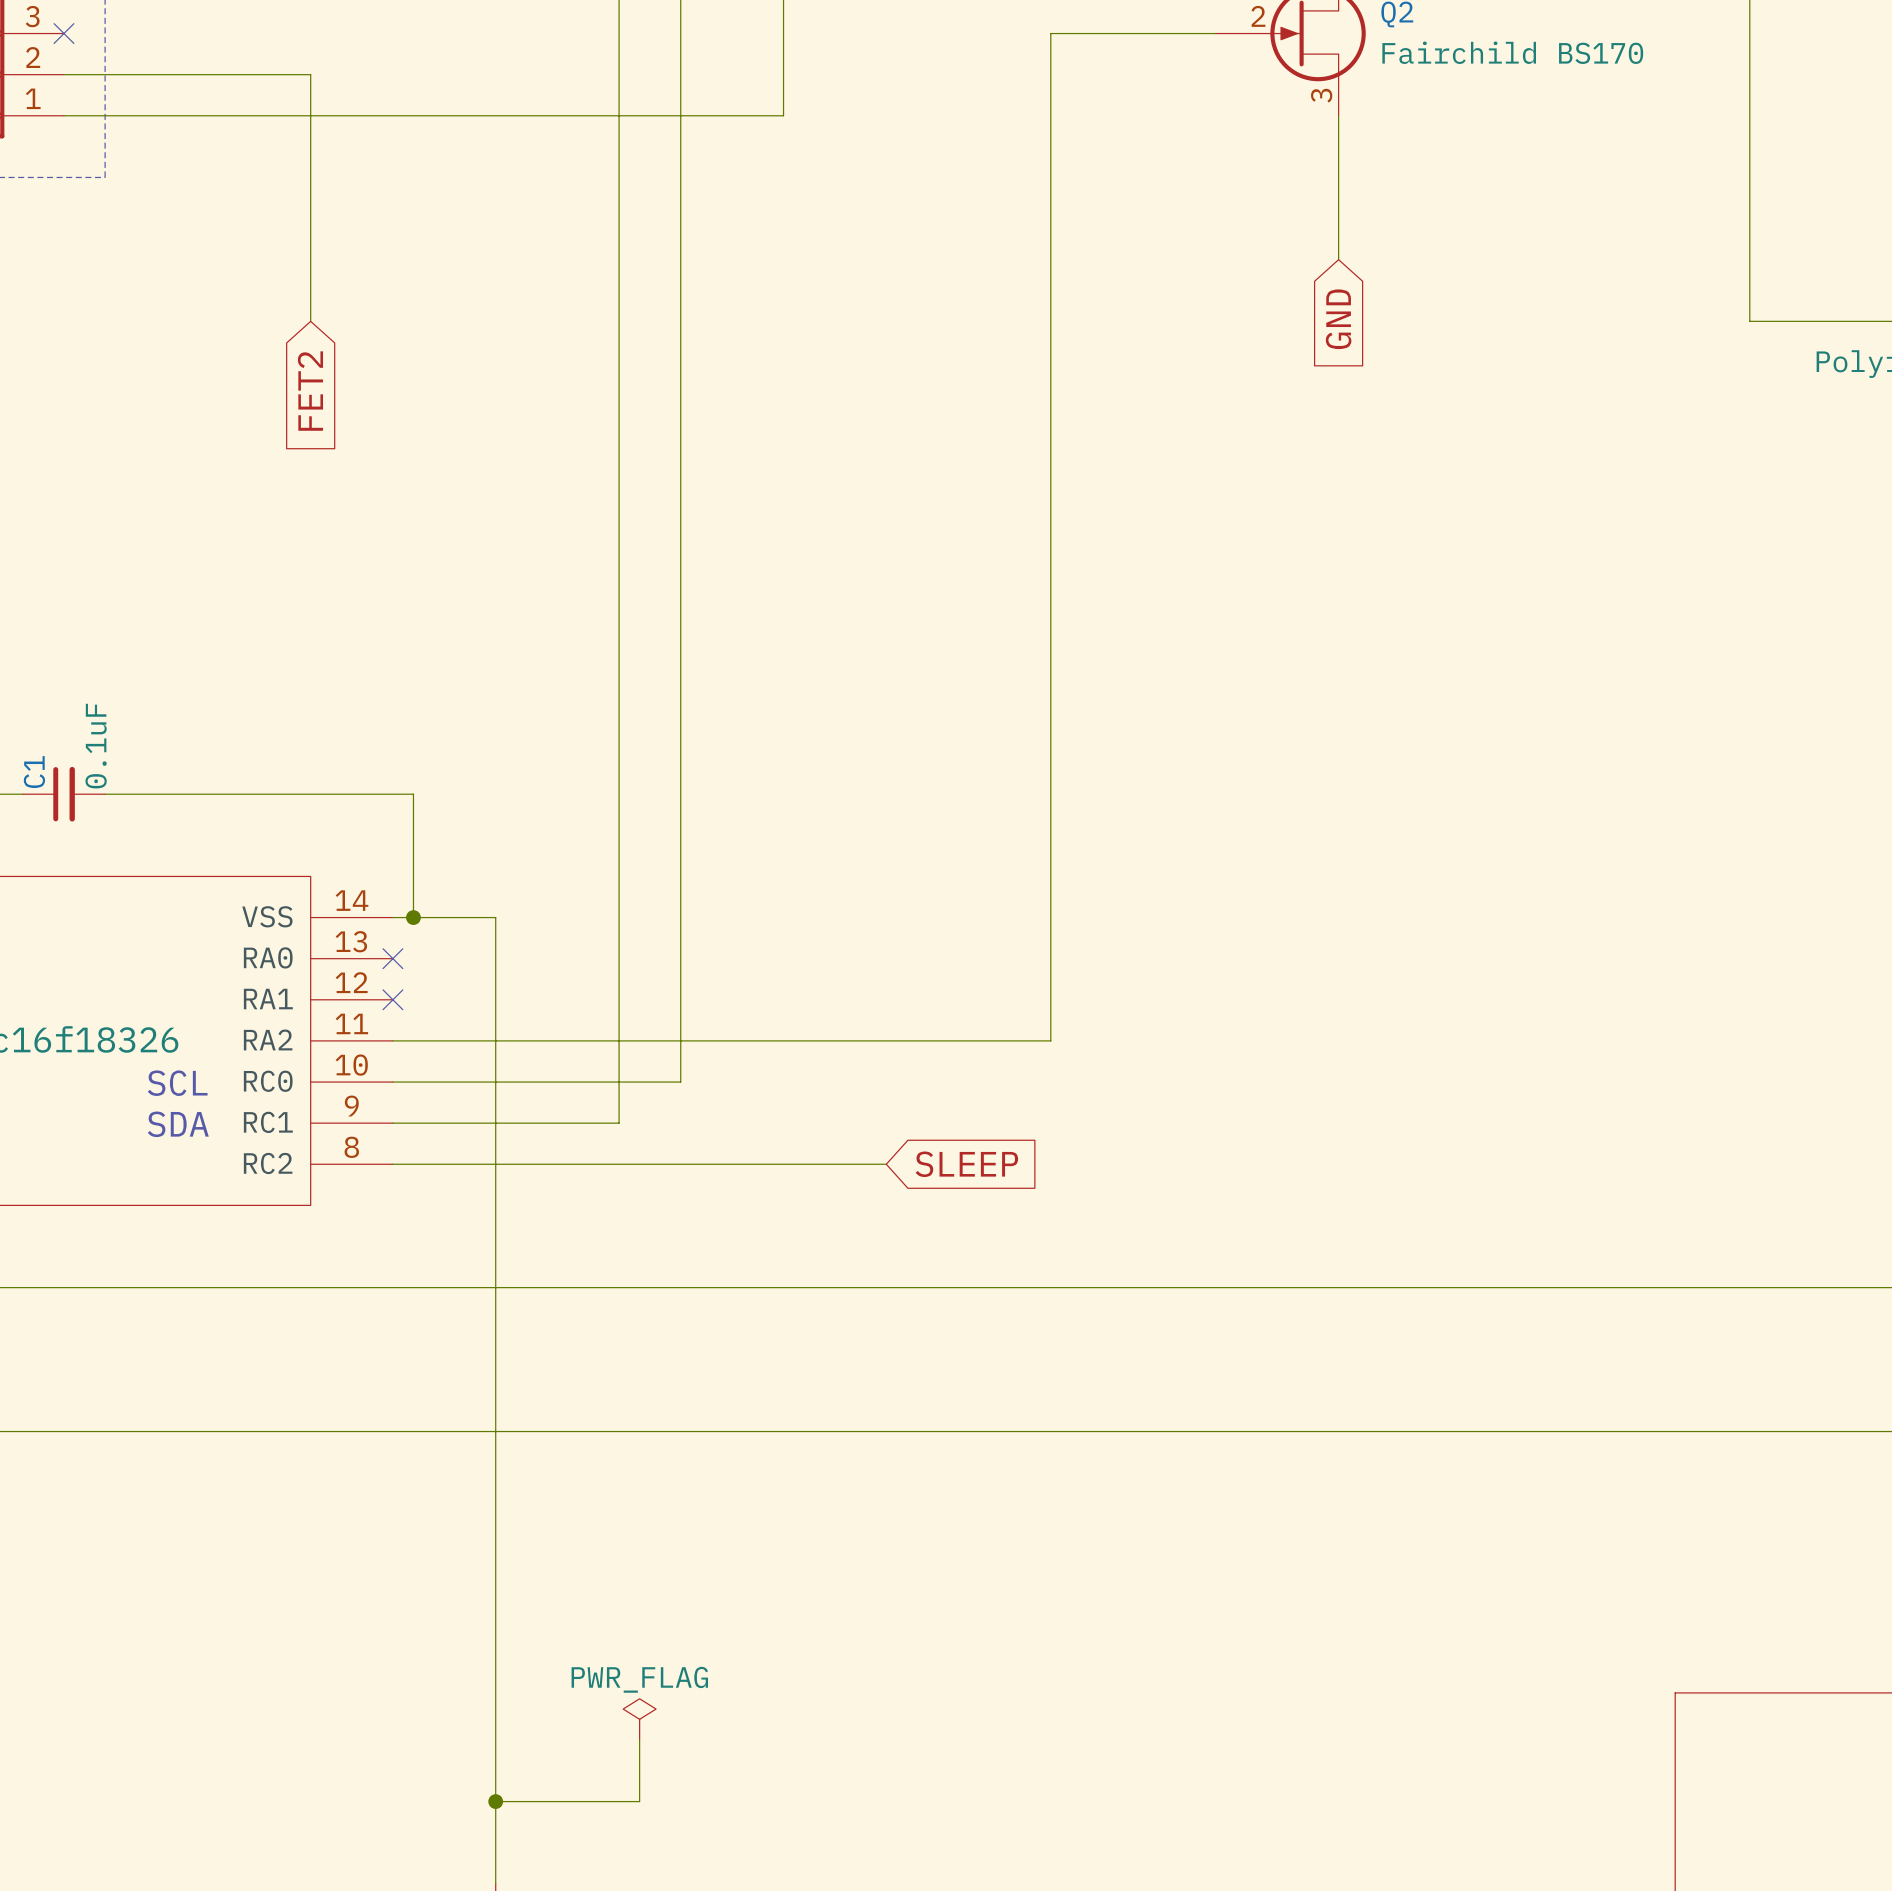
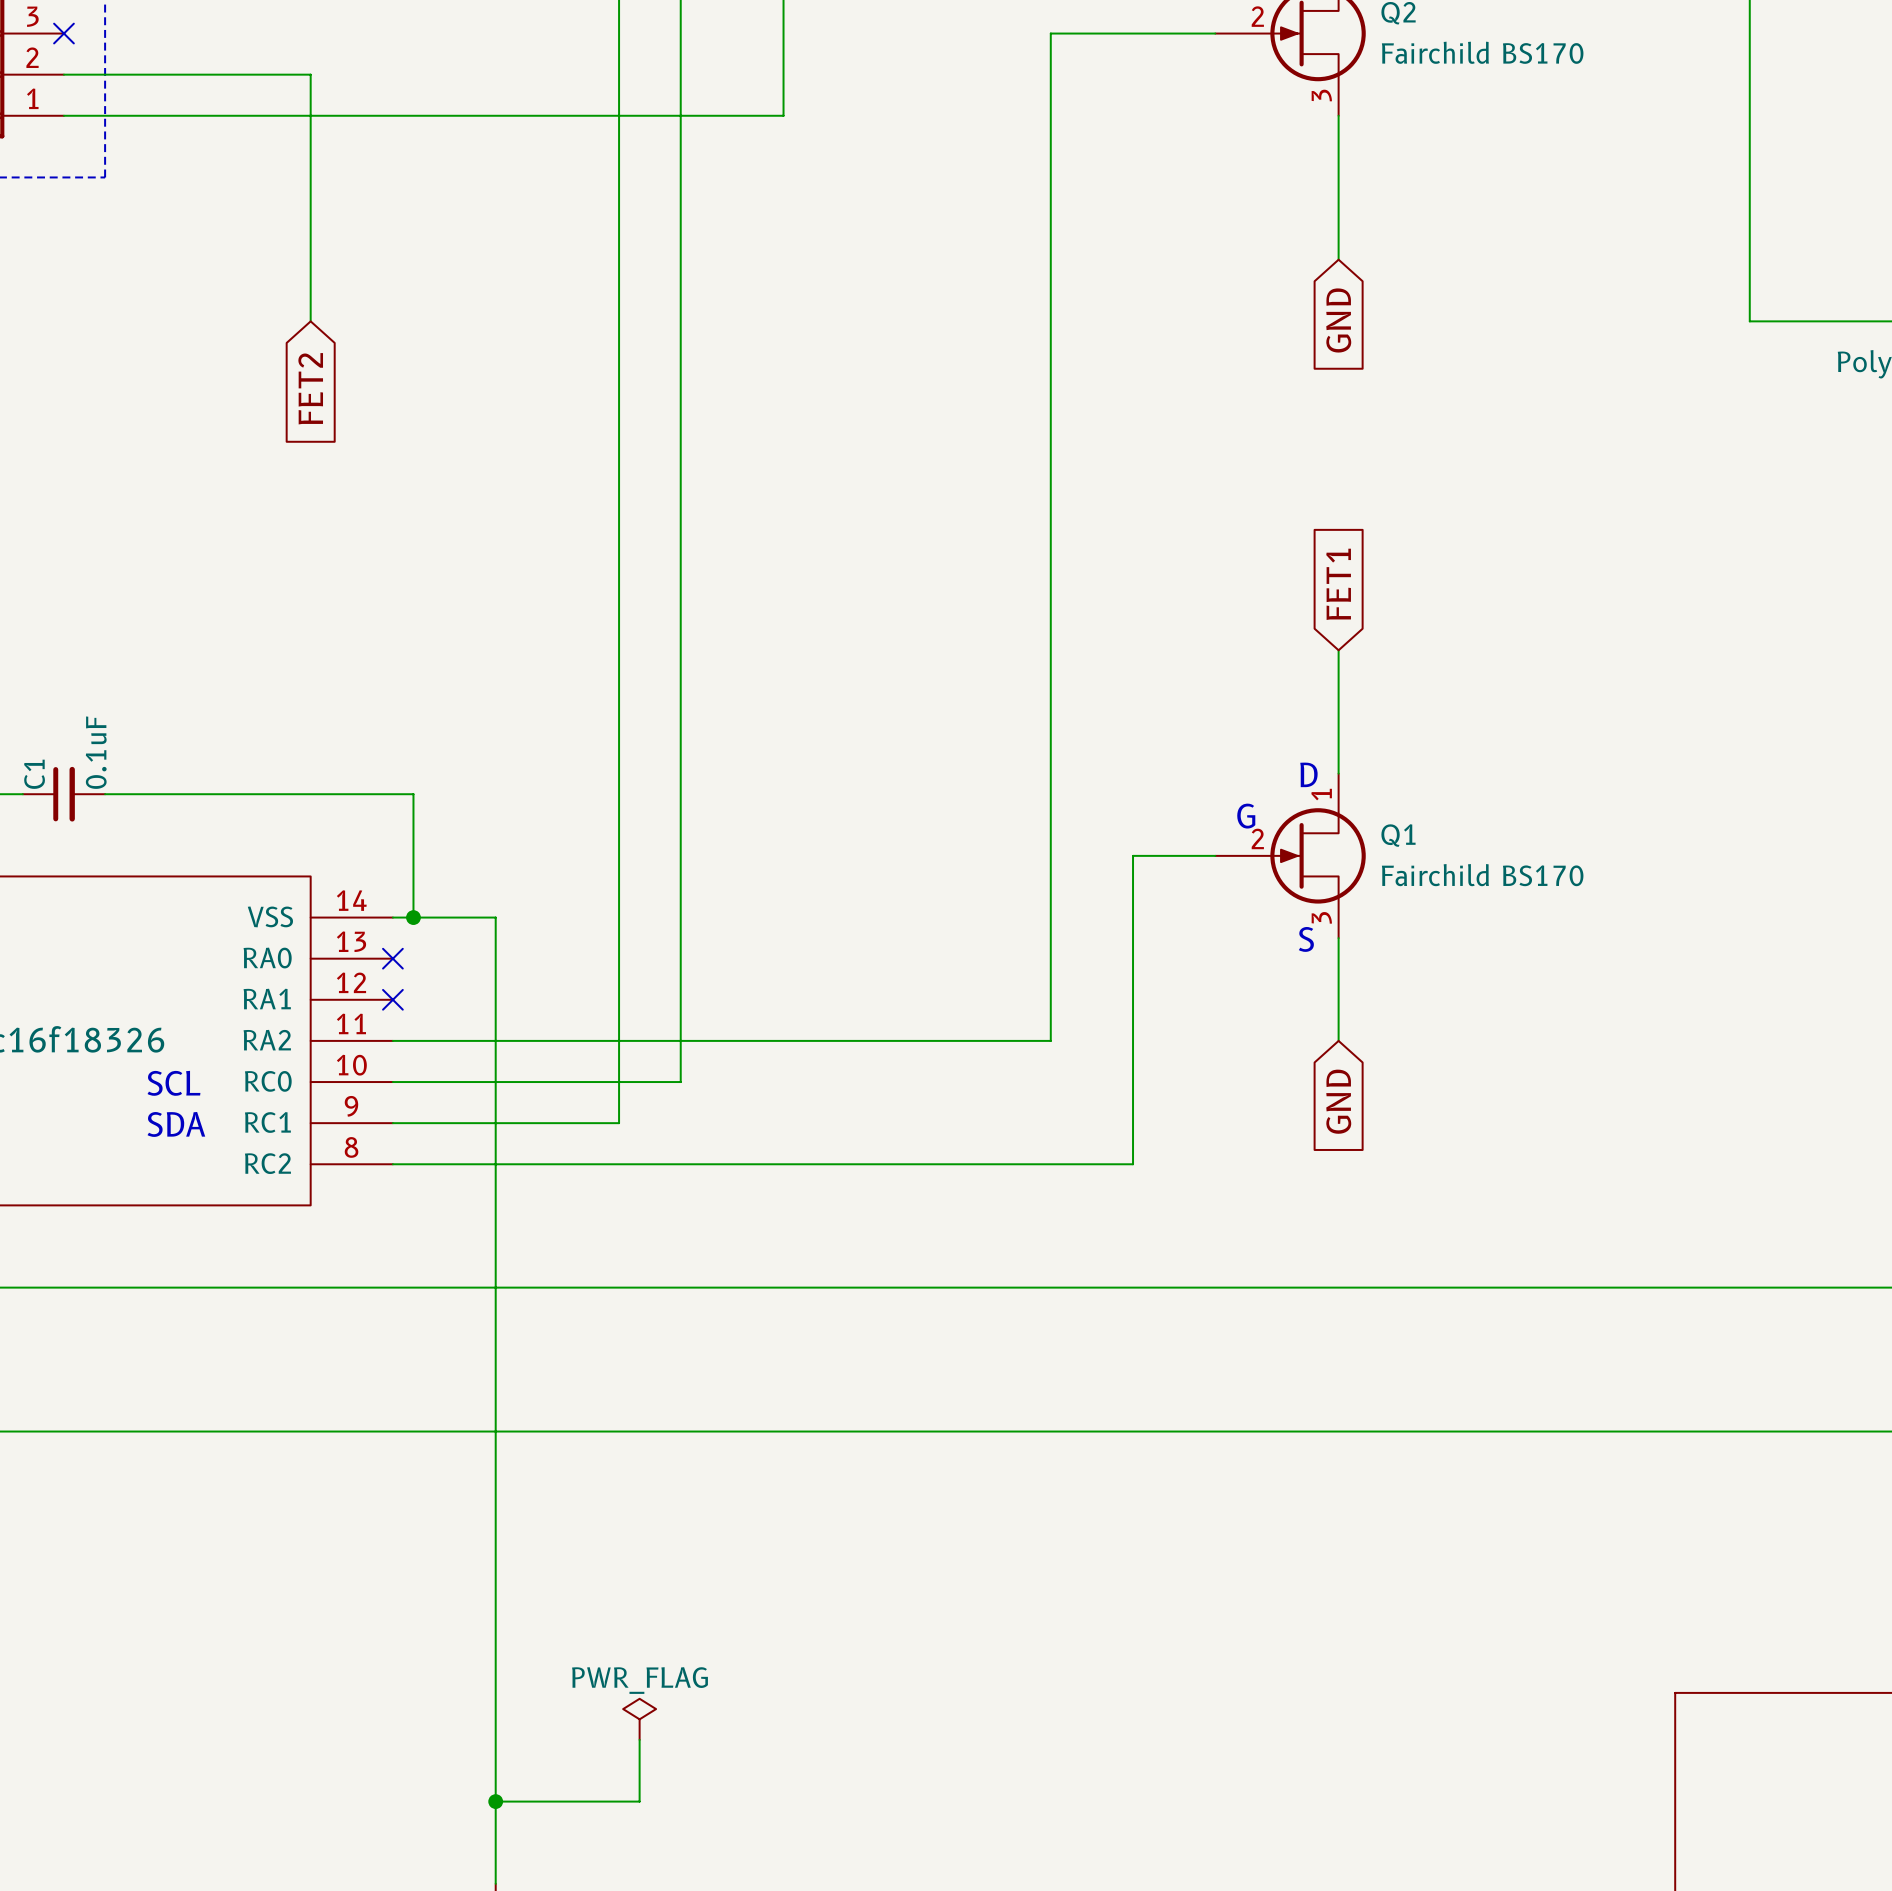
global label: none -> FET1 (1338, 584)
wire: none -> (1338, 650) (1338, 773)
text: none -> D (1308, 774)
text: none -> G (1246, 816)
wire: none -> (1215, 855) (1133, 855) (1133, 1164) (886, 1164)
Q1: none -> Fairchild BS170 (1290, 855)
wire: none -> (1338, 938) (1338, 1040)
text: none -> S (1306, 939)
global label: none -> GND (1338, 1101)
global label: SLEEP (966, 1164) -> none

